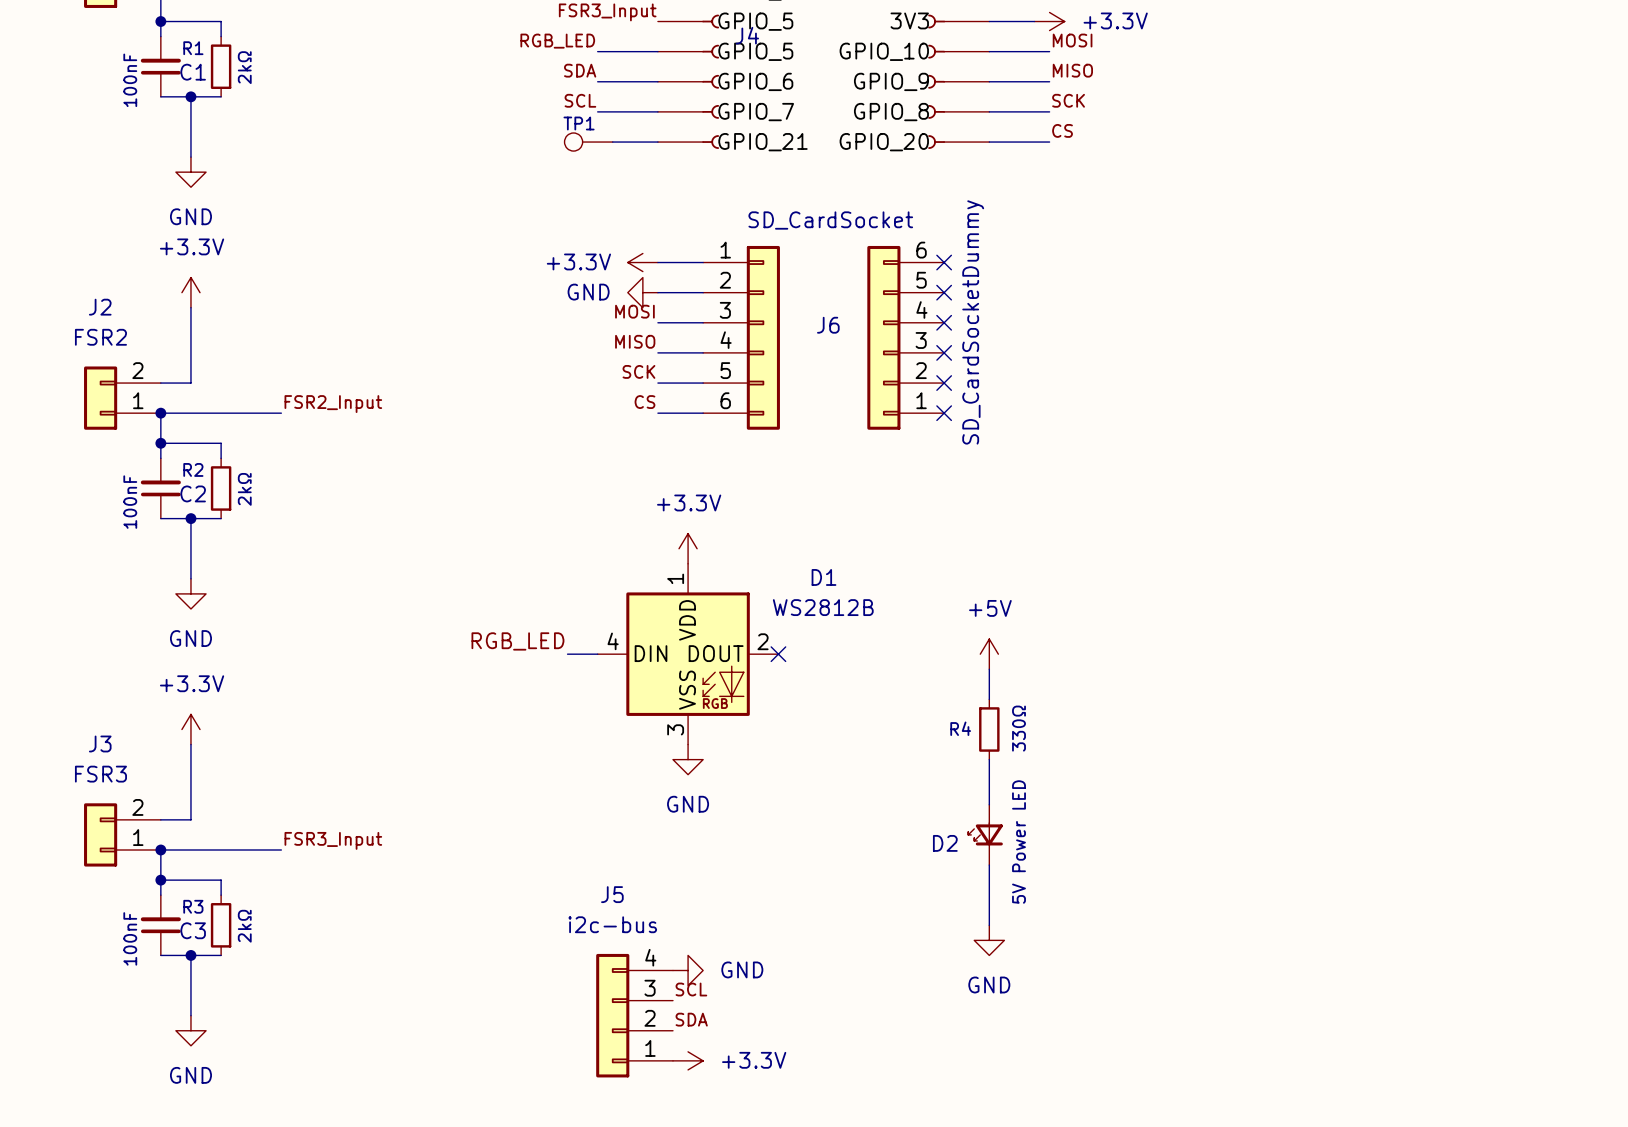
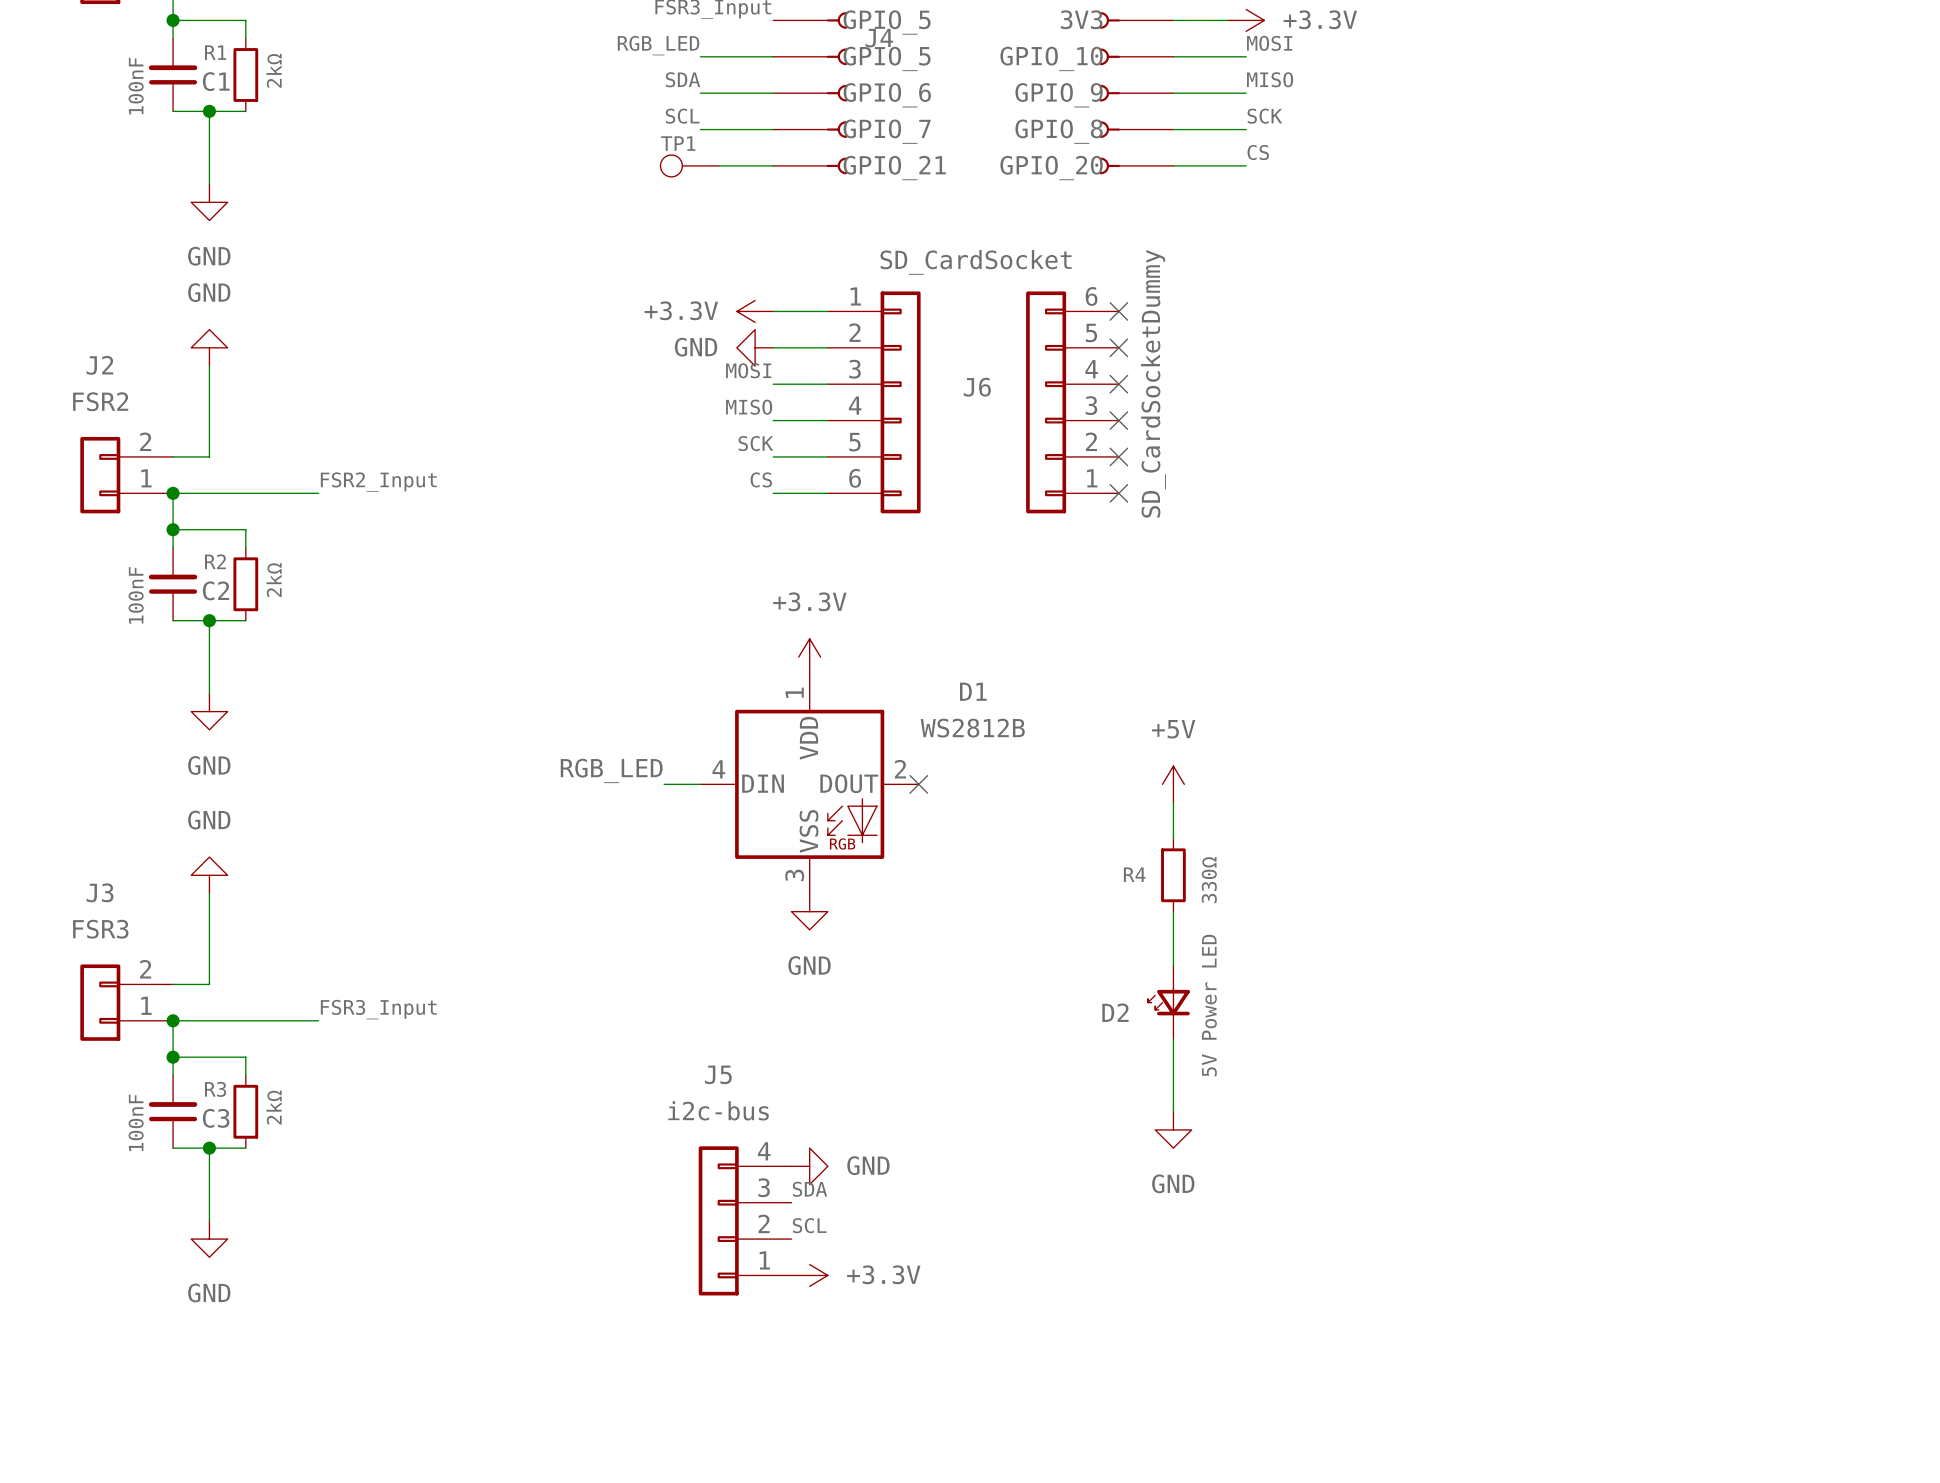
power symbol: +3.3V (190, 292) -> GND (209, 347)
power symbol: +3.3V (190, 729) -> GND (209, 875)
label: SCL (691, 989) -> SDA (809, 1189)
label: SDA (691, 1019) -> SCL (809, 1225)

